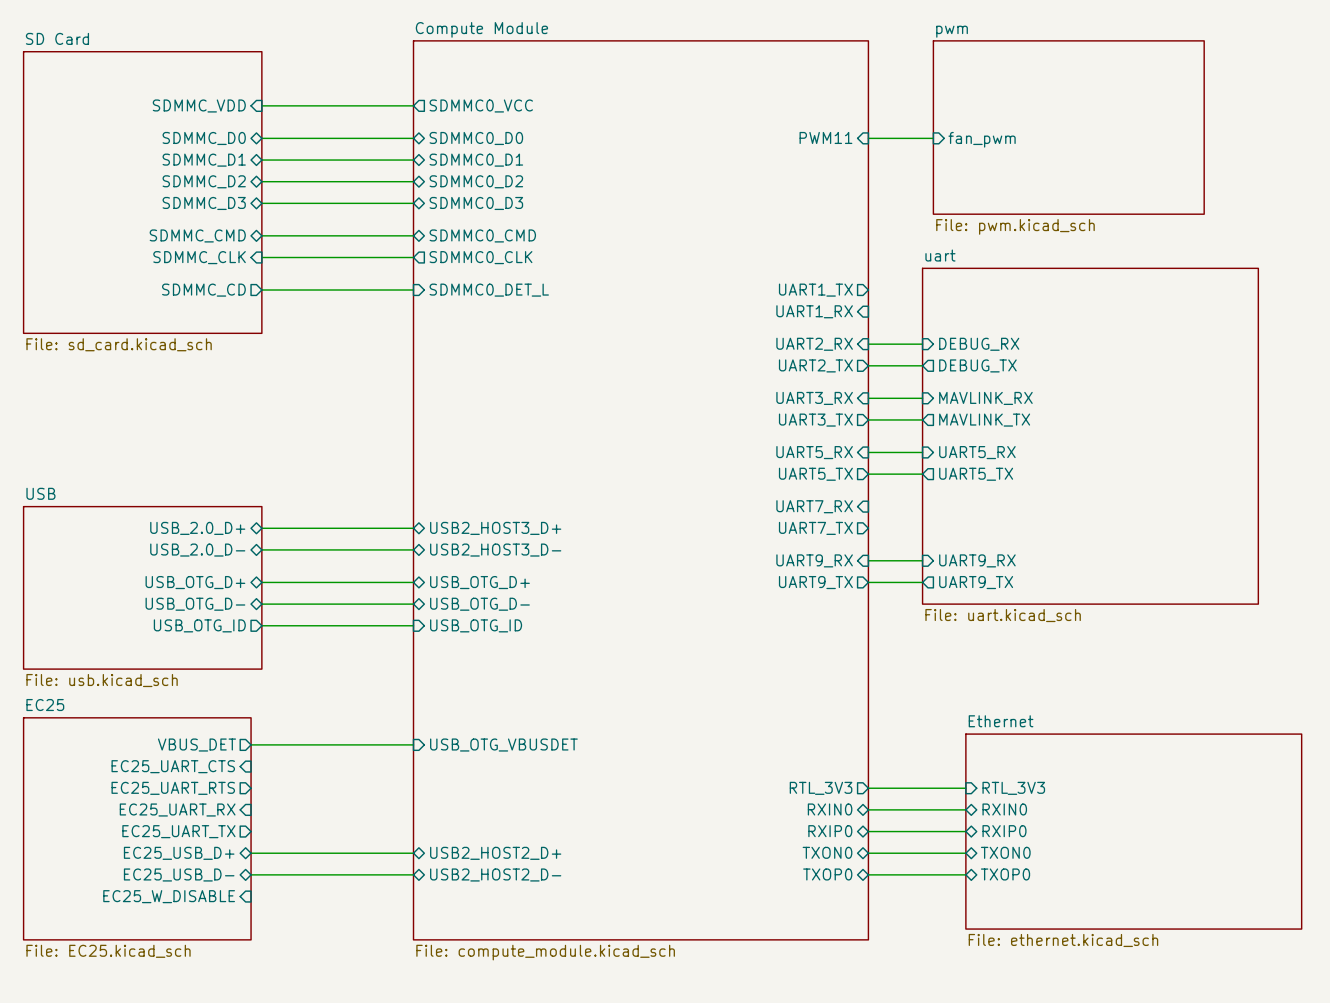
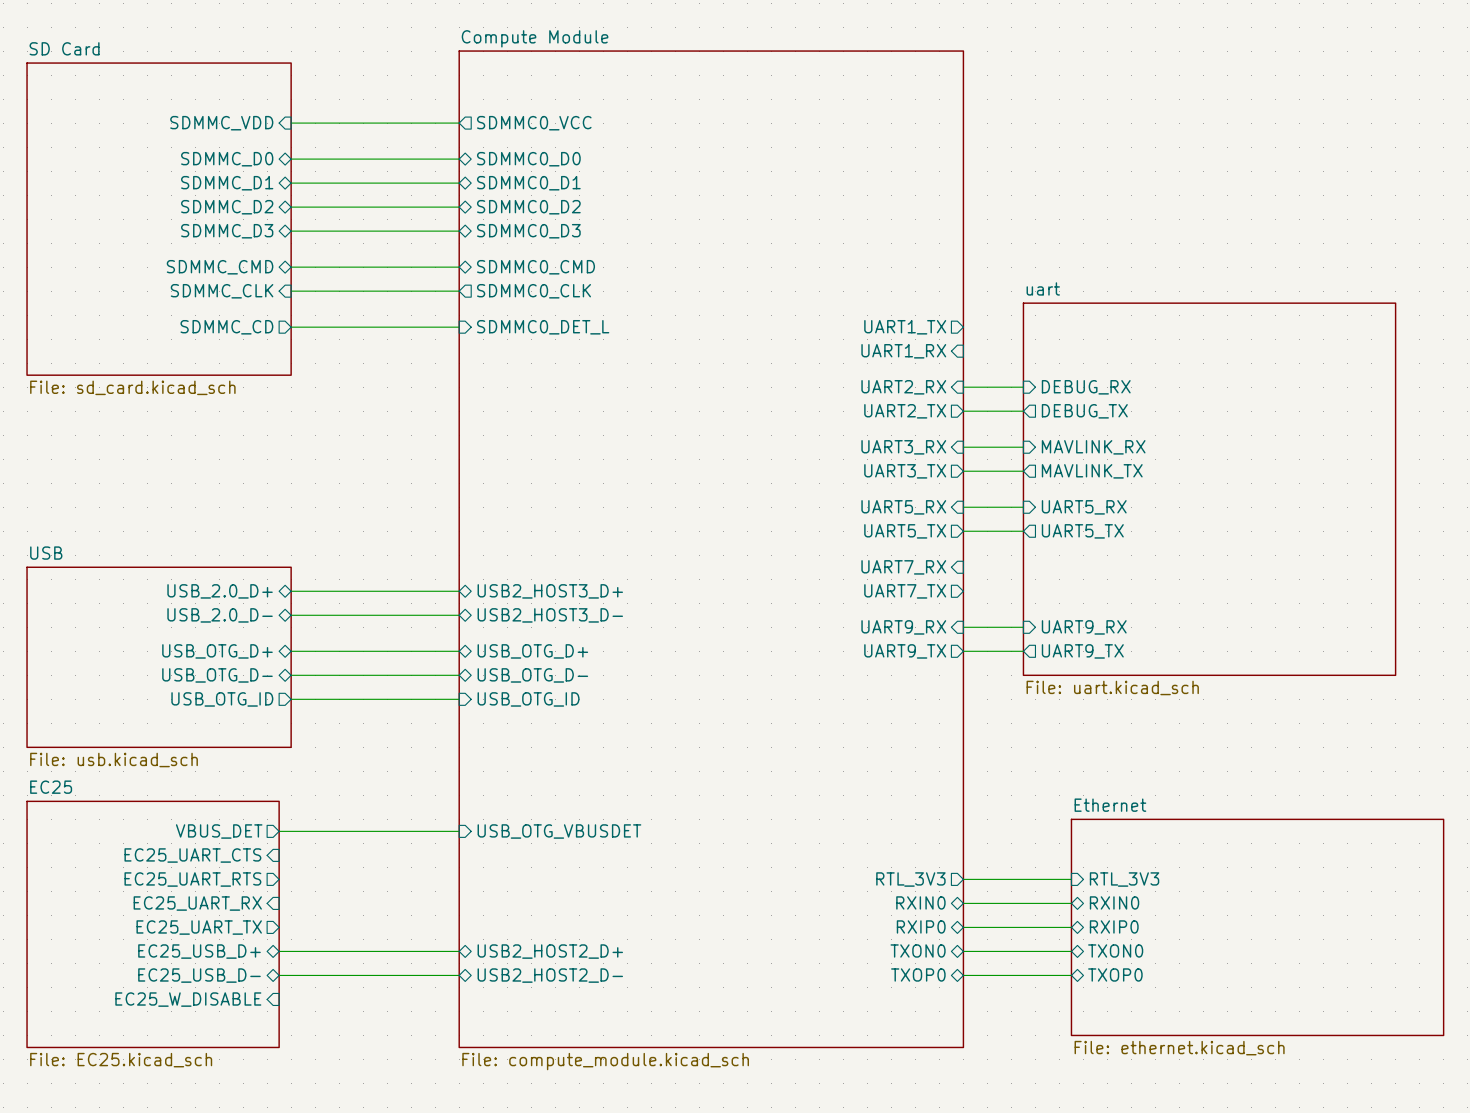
sheet pwm: File: pwm.kicad_sch (1068, 127) -> none
sheet pin: PWM11 (825, 137) -> none
wire: (868, 138) (933, 138) -> none
sheet pin: fan_pwm (982, 139) -> none

